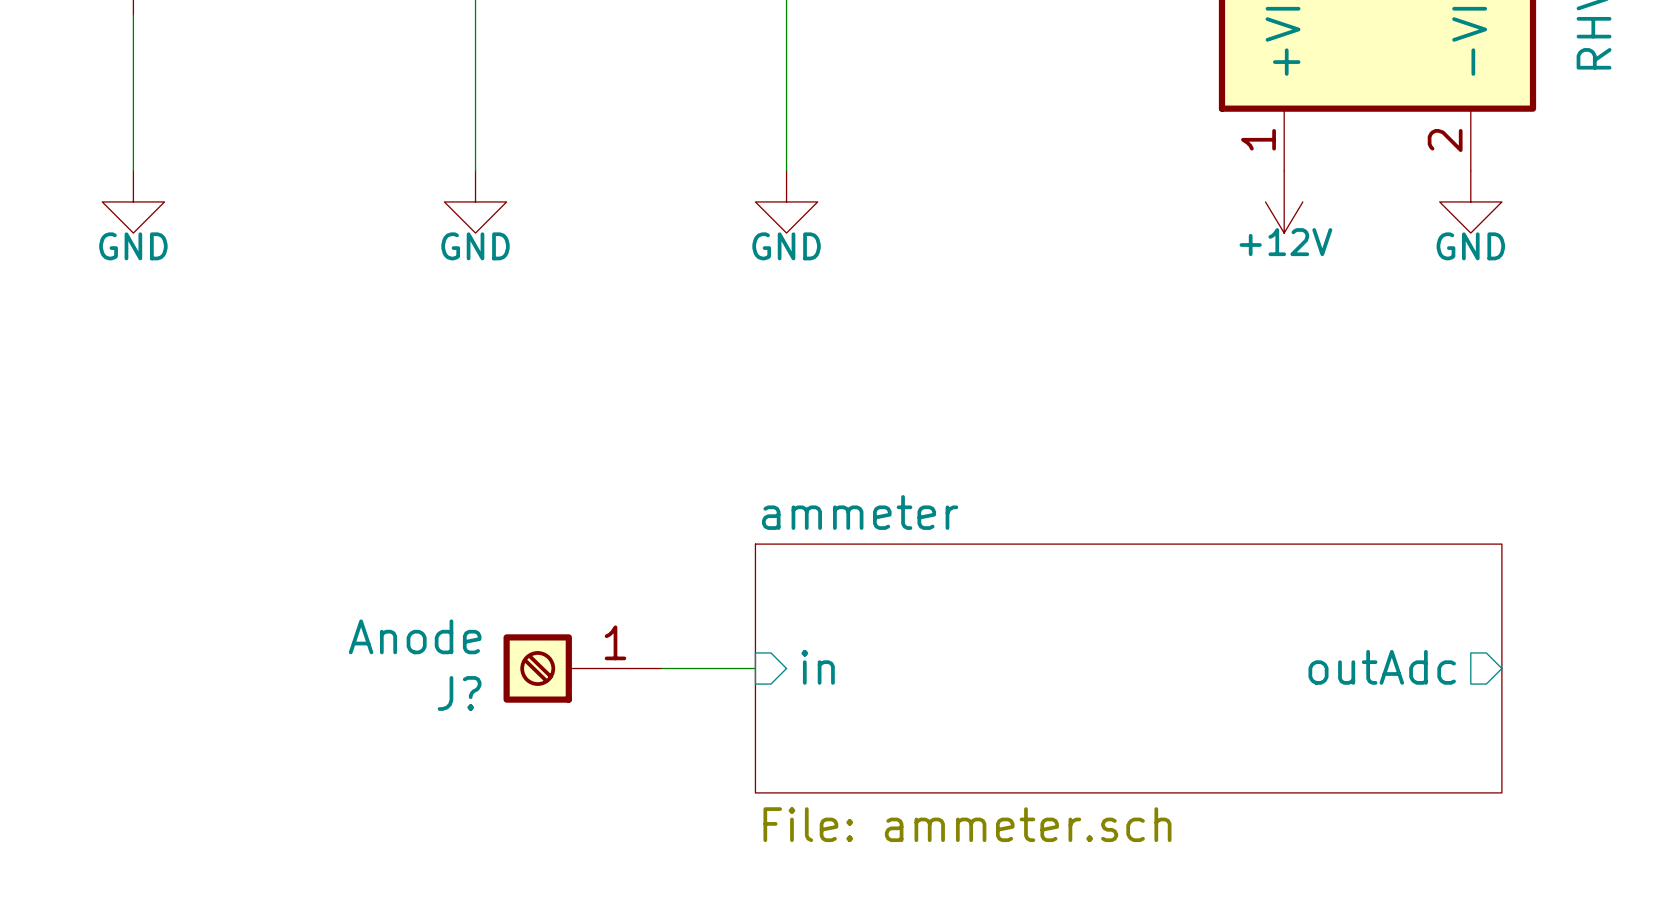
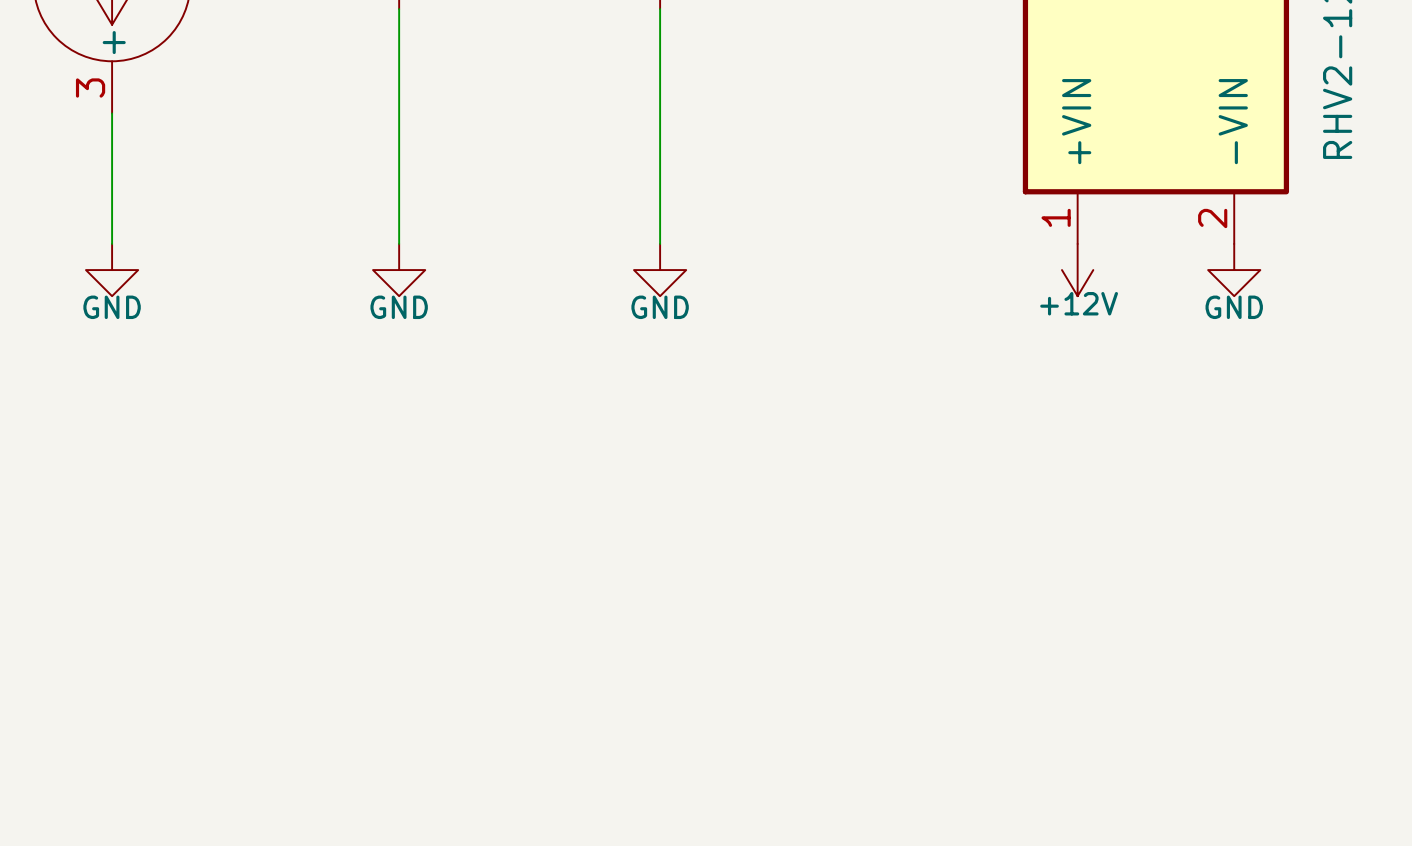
sheet pin: in (818, 667) -> none
sheet pin: outAdc (1382, 667) -> none
J?: Anode (582, 668) -> none
wire: (662, 668) (755, 668) -> none
sheet ammeter: File: ammeter.sch (1128, 668) -> none

